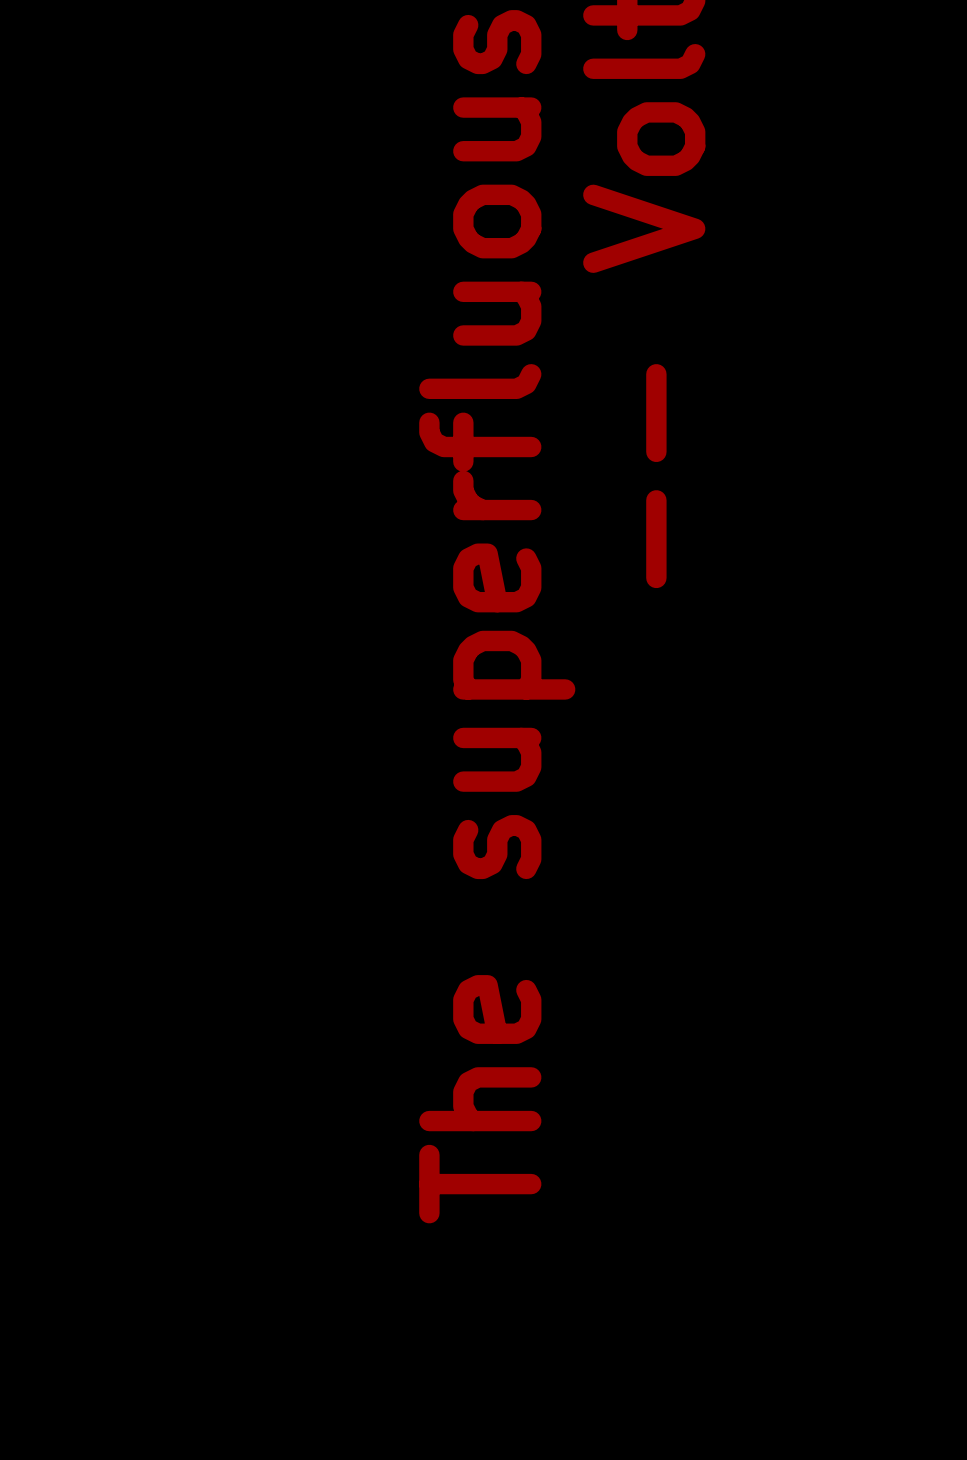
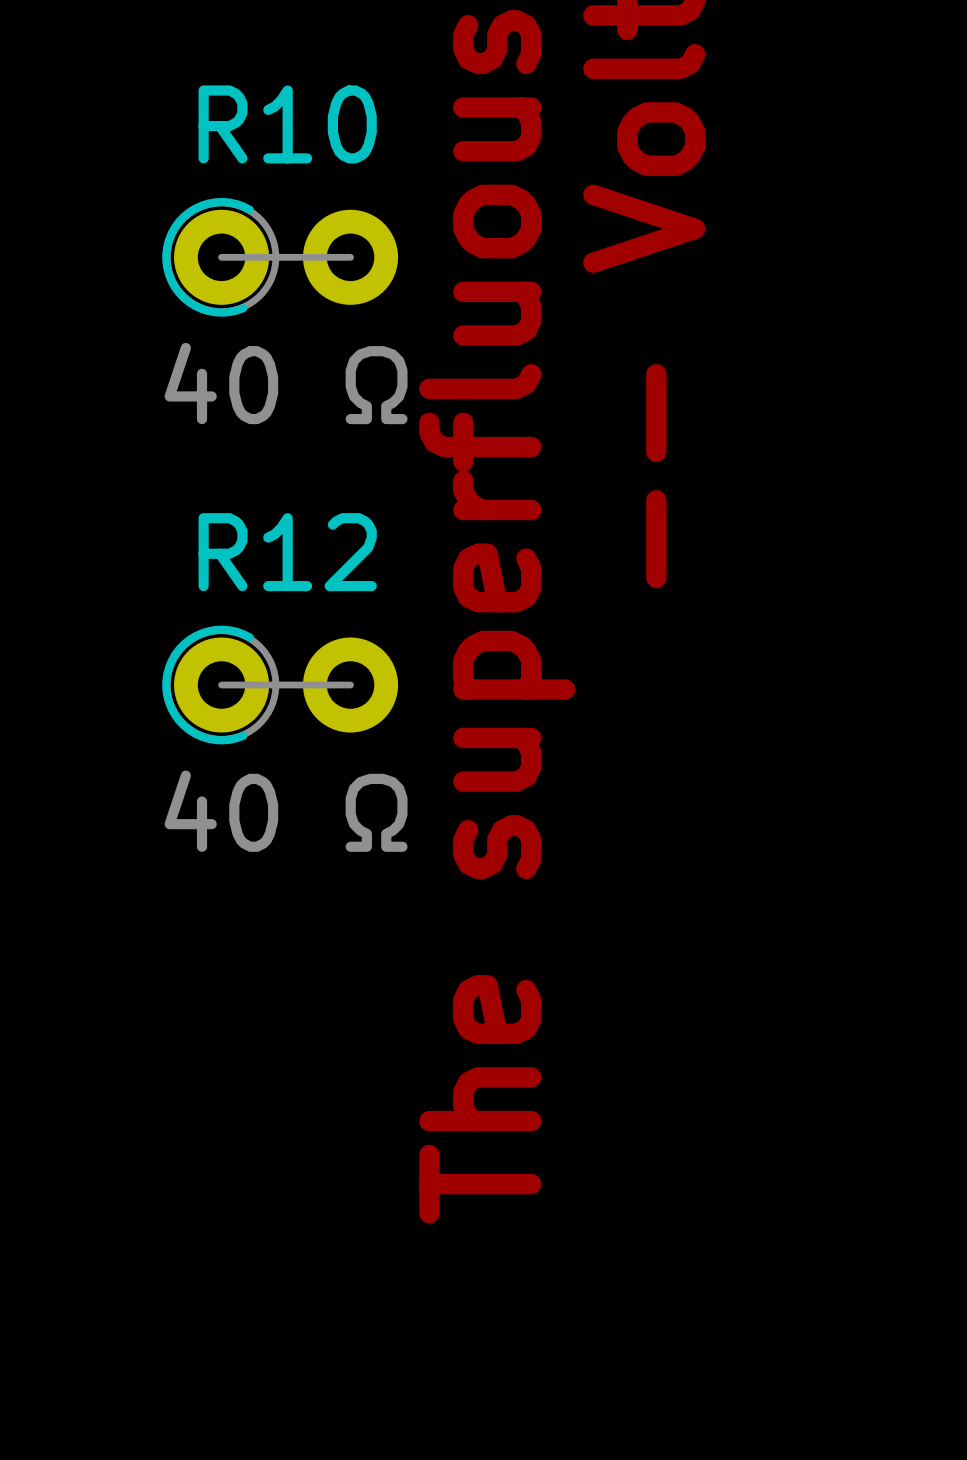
R10: none -> 40 Ω (280, 257)
R12: none -> 40 Ω (280, 685)

